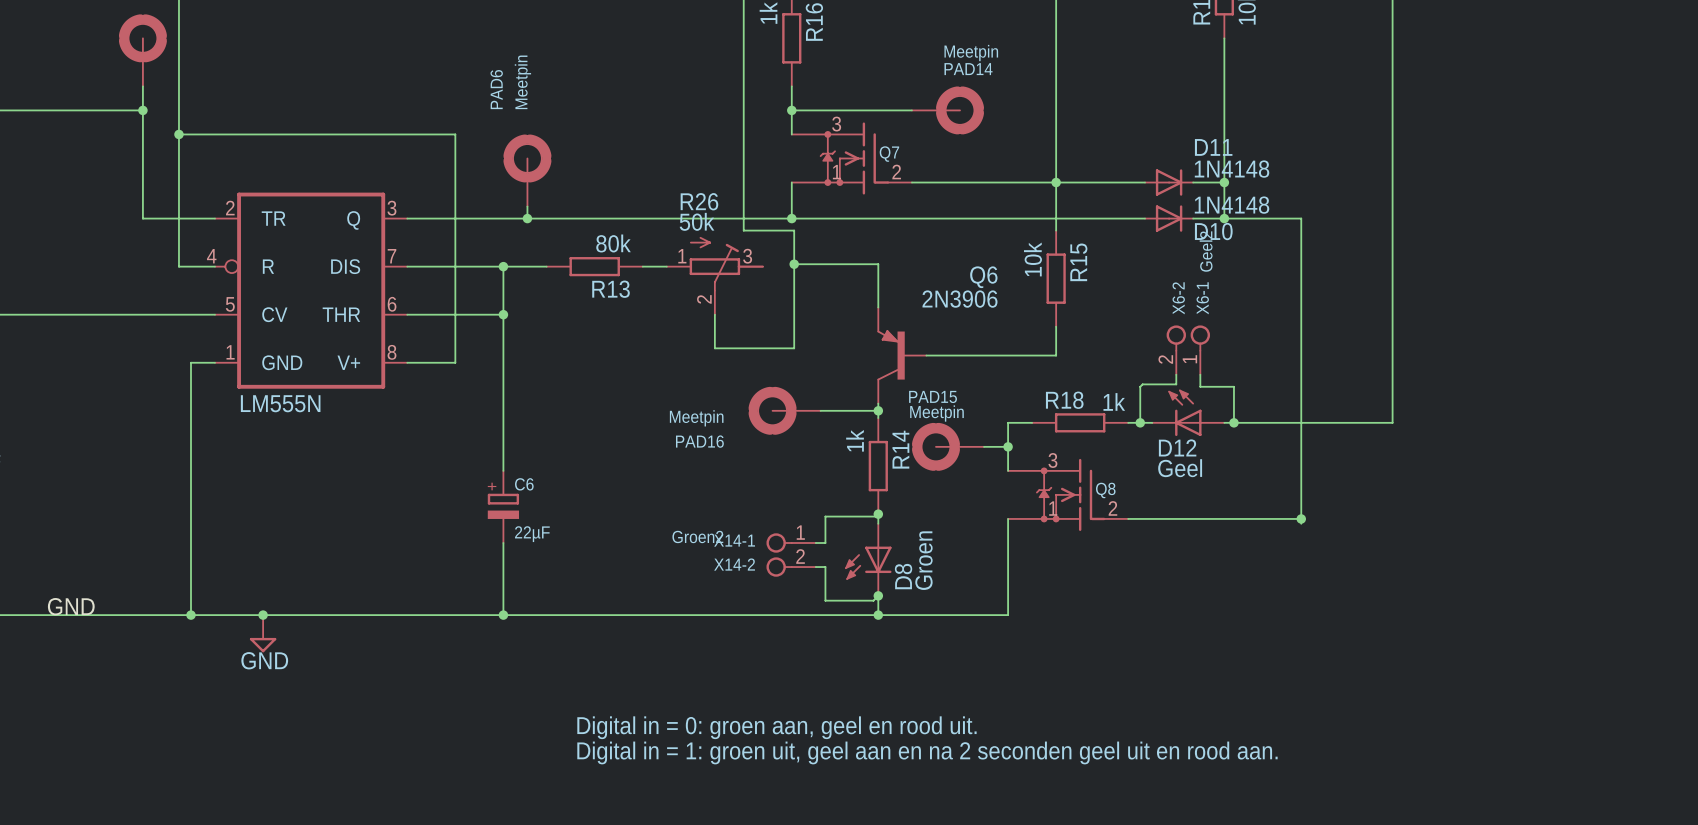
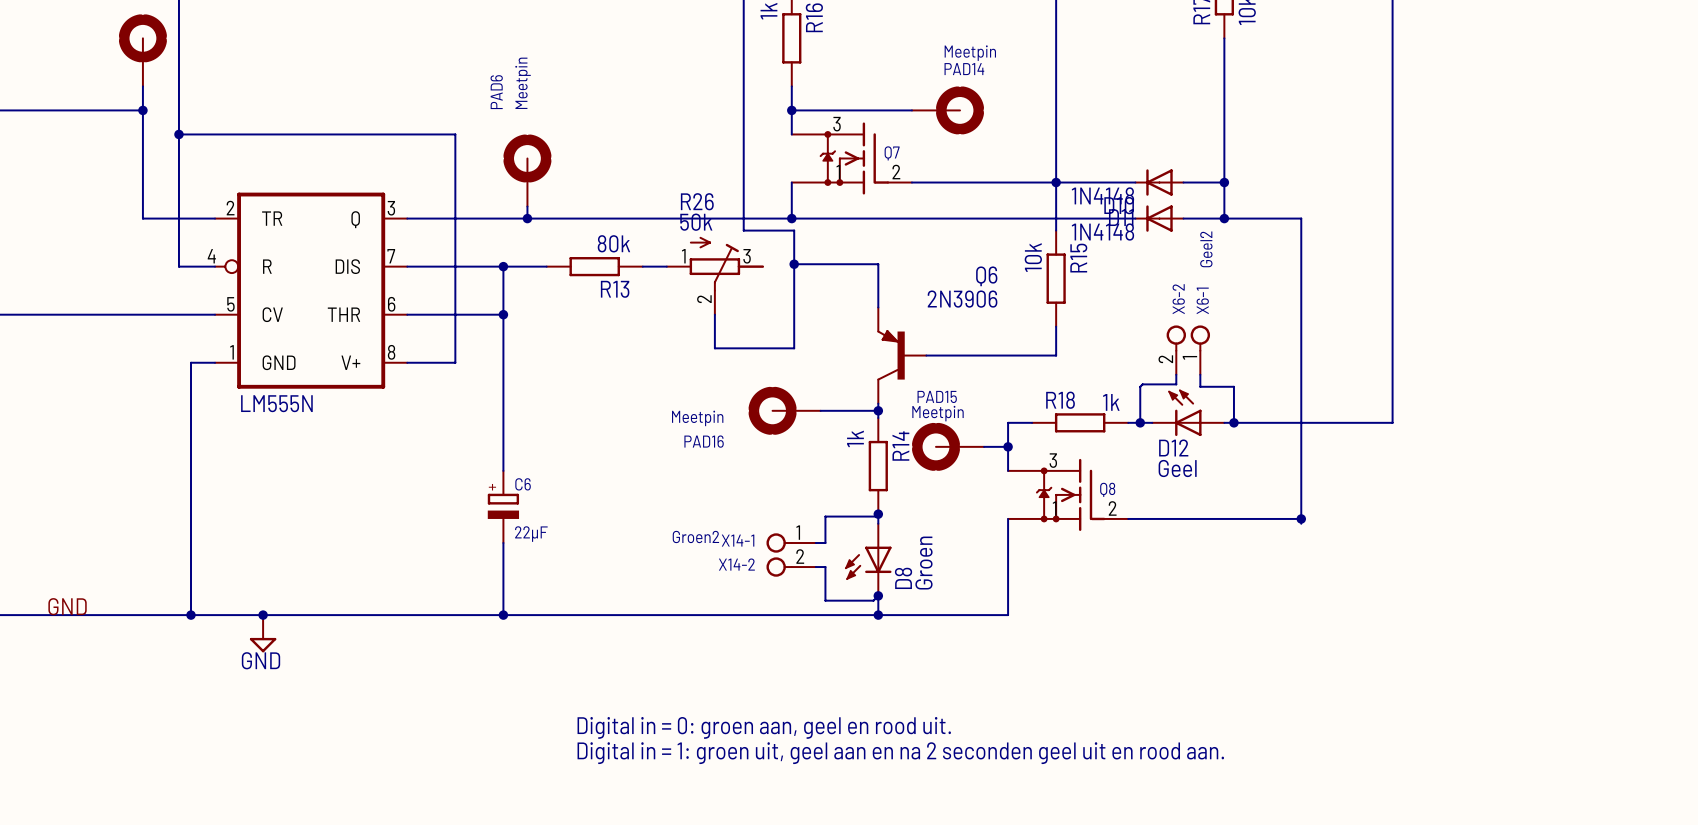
D11 rotation: 0° (1169, 182) -> 180° (1159, 182)
D10 rotation: 0° (1169, 218) -> 180° (1159, 218)

